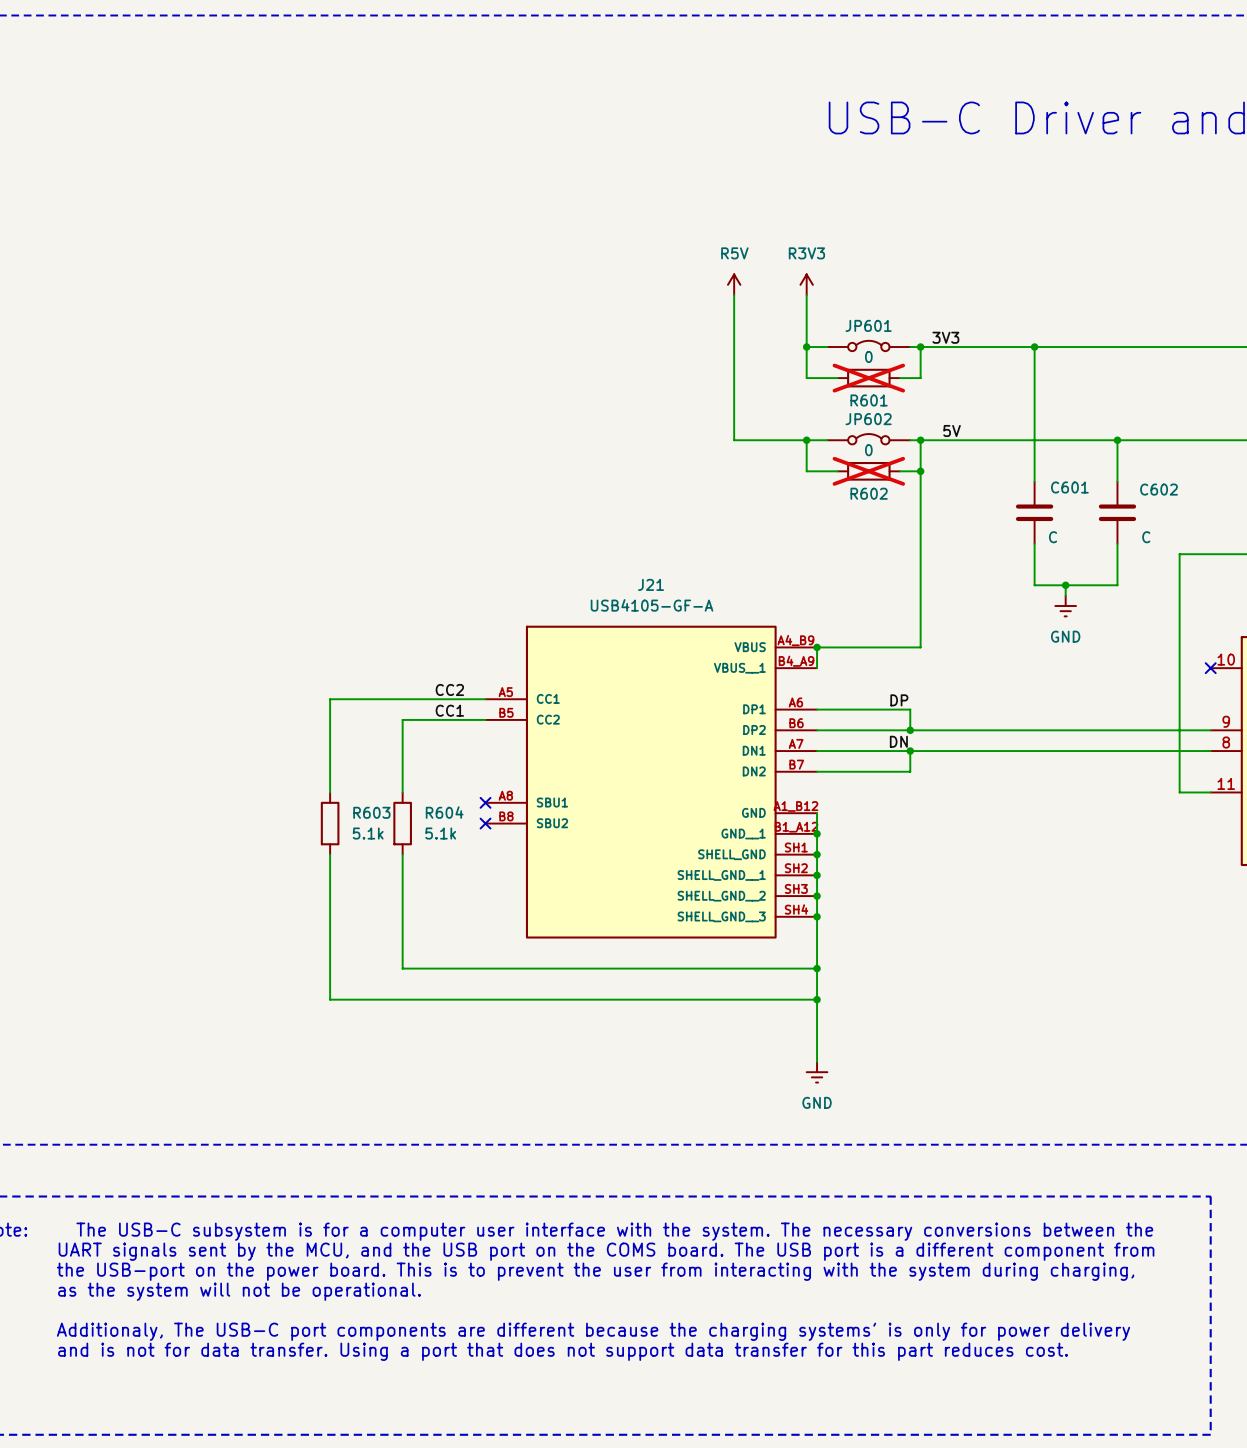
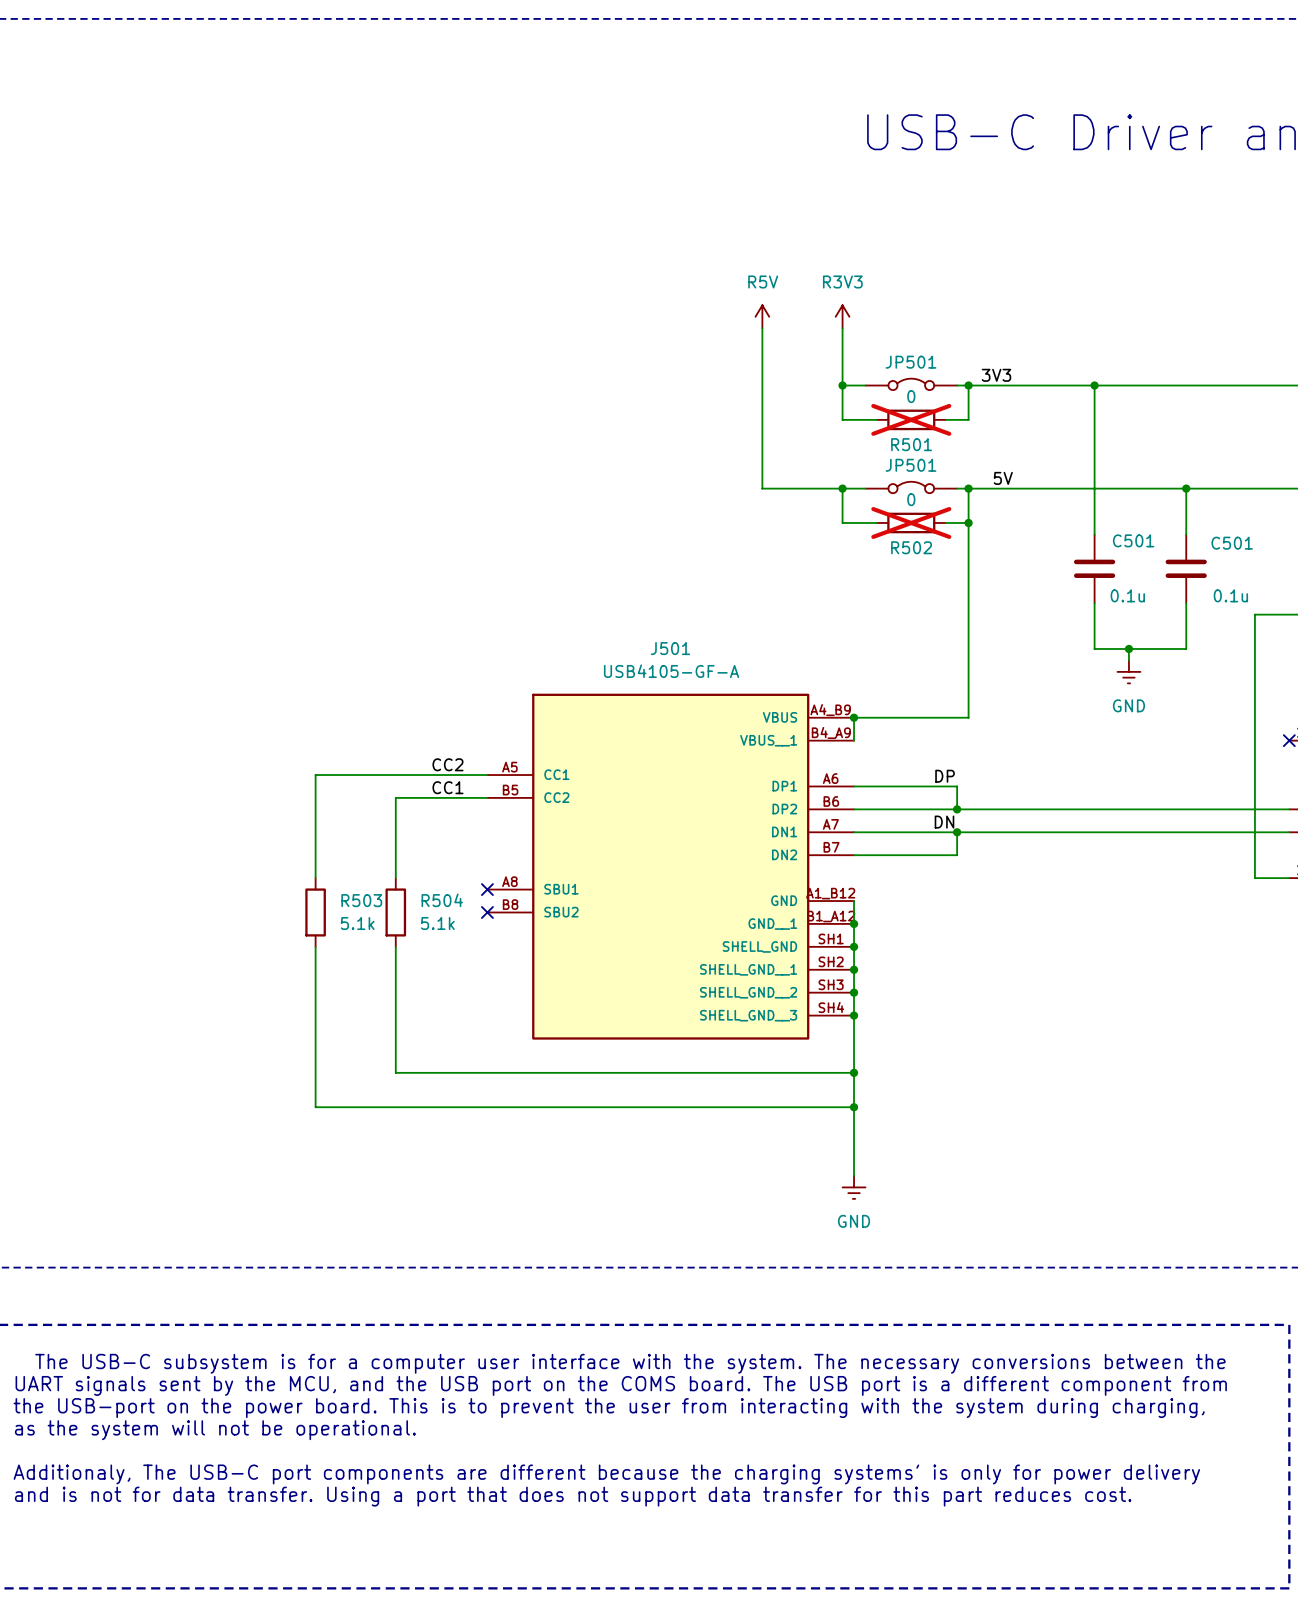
JP601 name: JP601 (868, 325) -> JP501 (911, 362)
R601 name: R601 (869, 400) -> R501 (911, 444)
JP602 name: JP602 (868, 419) -> JP501 (911, 465)
C601 name: C601 (1069, 487) -> C501 (1133, 540)
C602 name: C602 (1158, 489) -> C501 (1232, 543)
R602 name: R602 (869, 493) -> R502 (911, 547)
C601 value: C (1053, 537) -> 0.1u (1127, 595)
C602 value: C (1146, 537) -> 0.1u (1230, 595)
J21 name: J21 (651, 584) -> J501 (670, 648)
R603 name: R603 (371, 812) -> R503 (361, 900)
R604 name: R604 (444, 812) -> R504 (442, 900)

